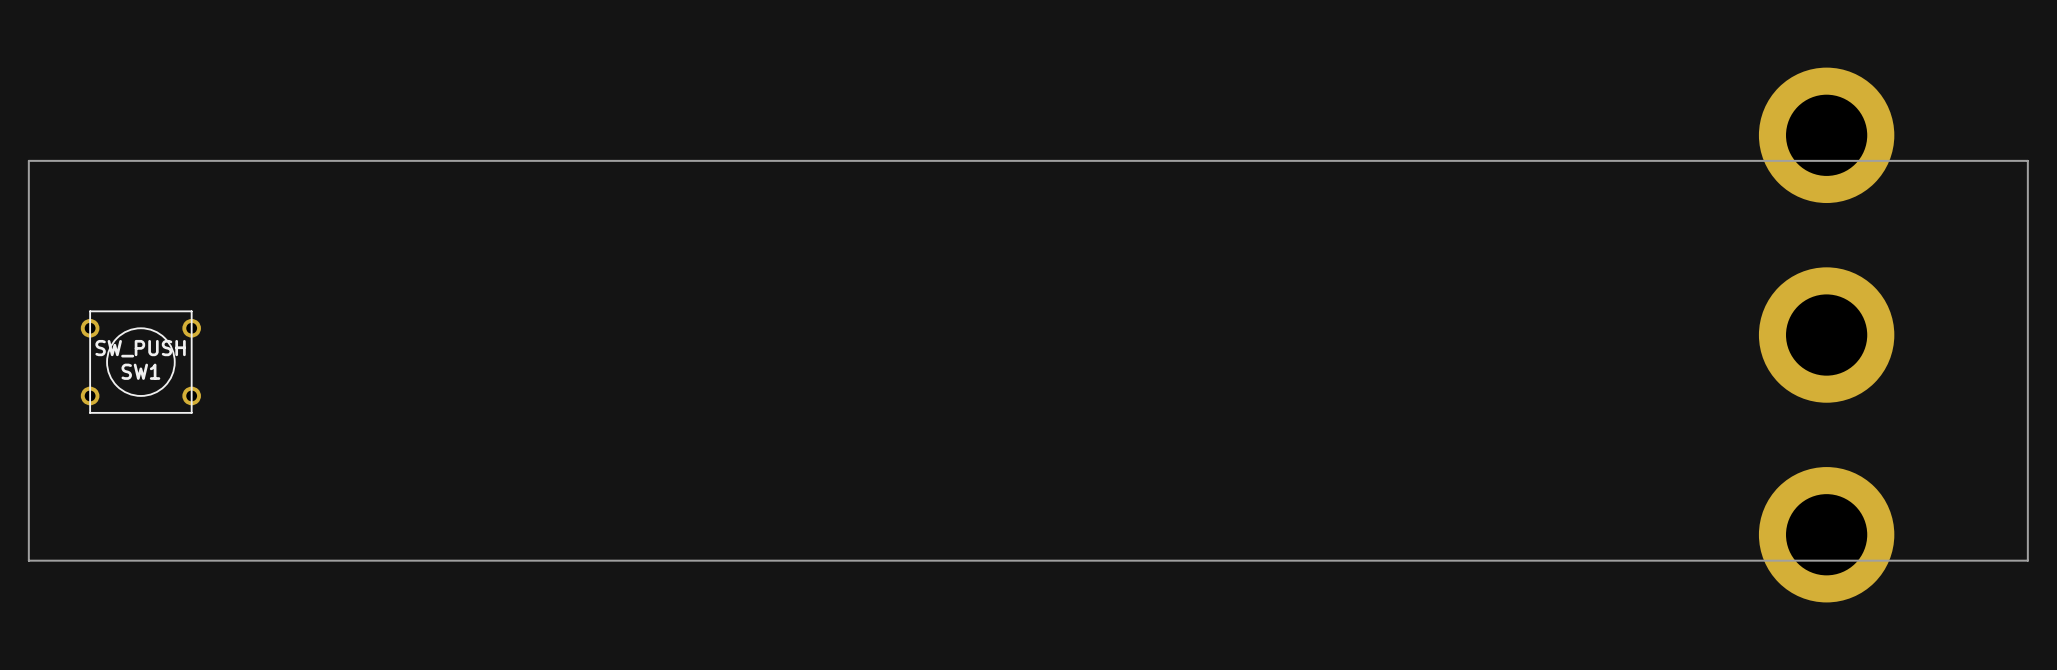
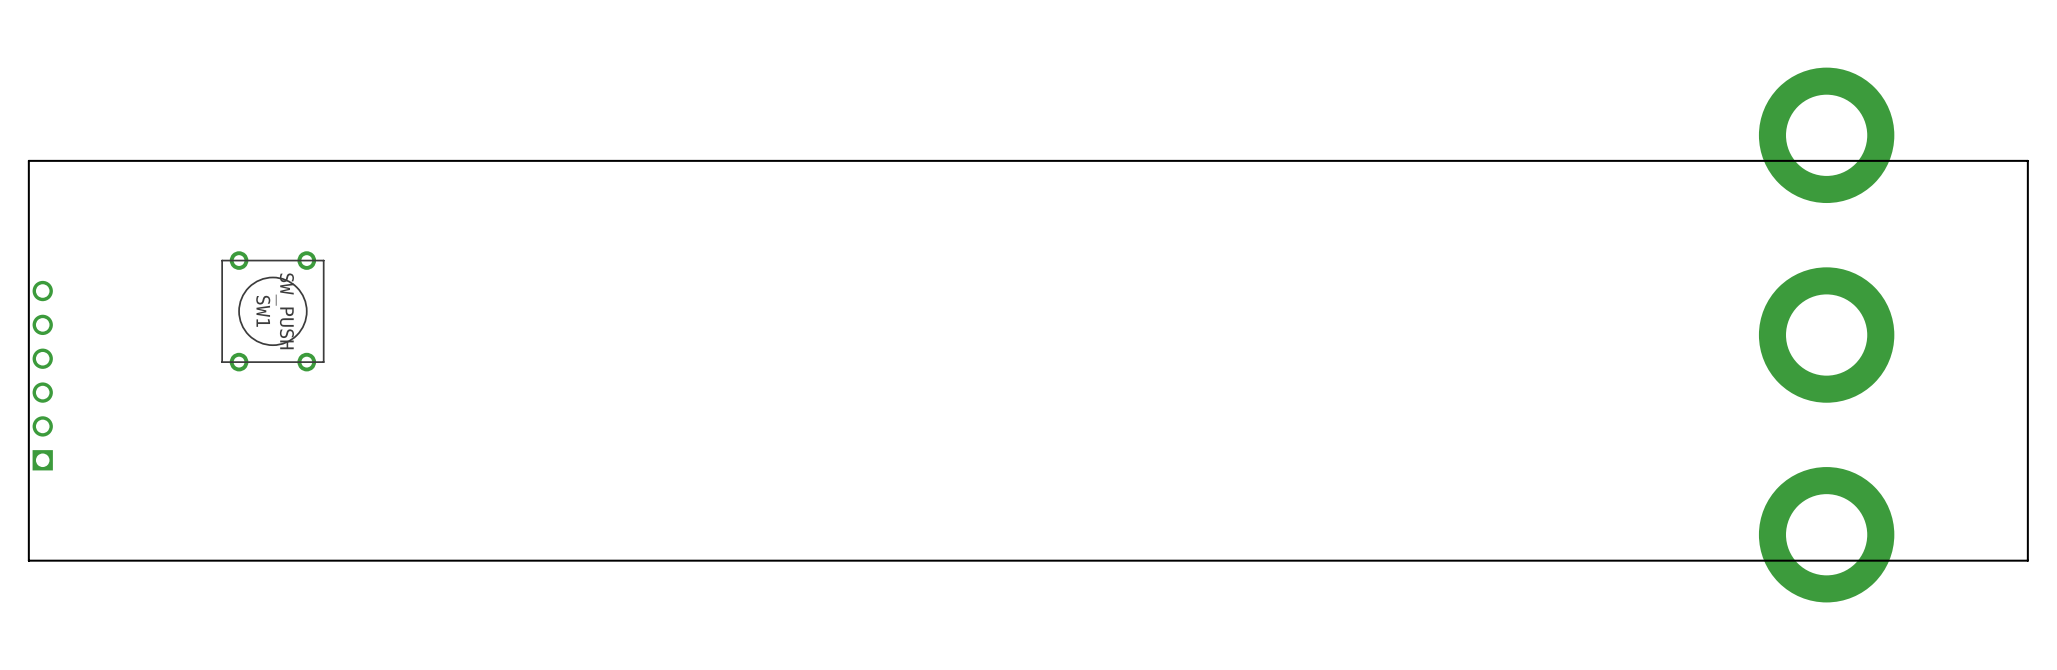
SW1 rotation: 0° (140, 362) -> 90° clockwise (272, 311)
SW1 position: (140, 362) -> (272, 311)
part: none -> (42, 375)

